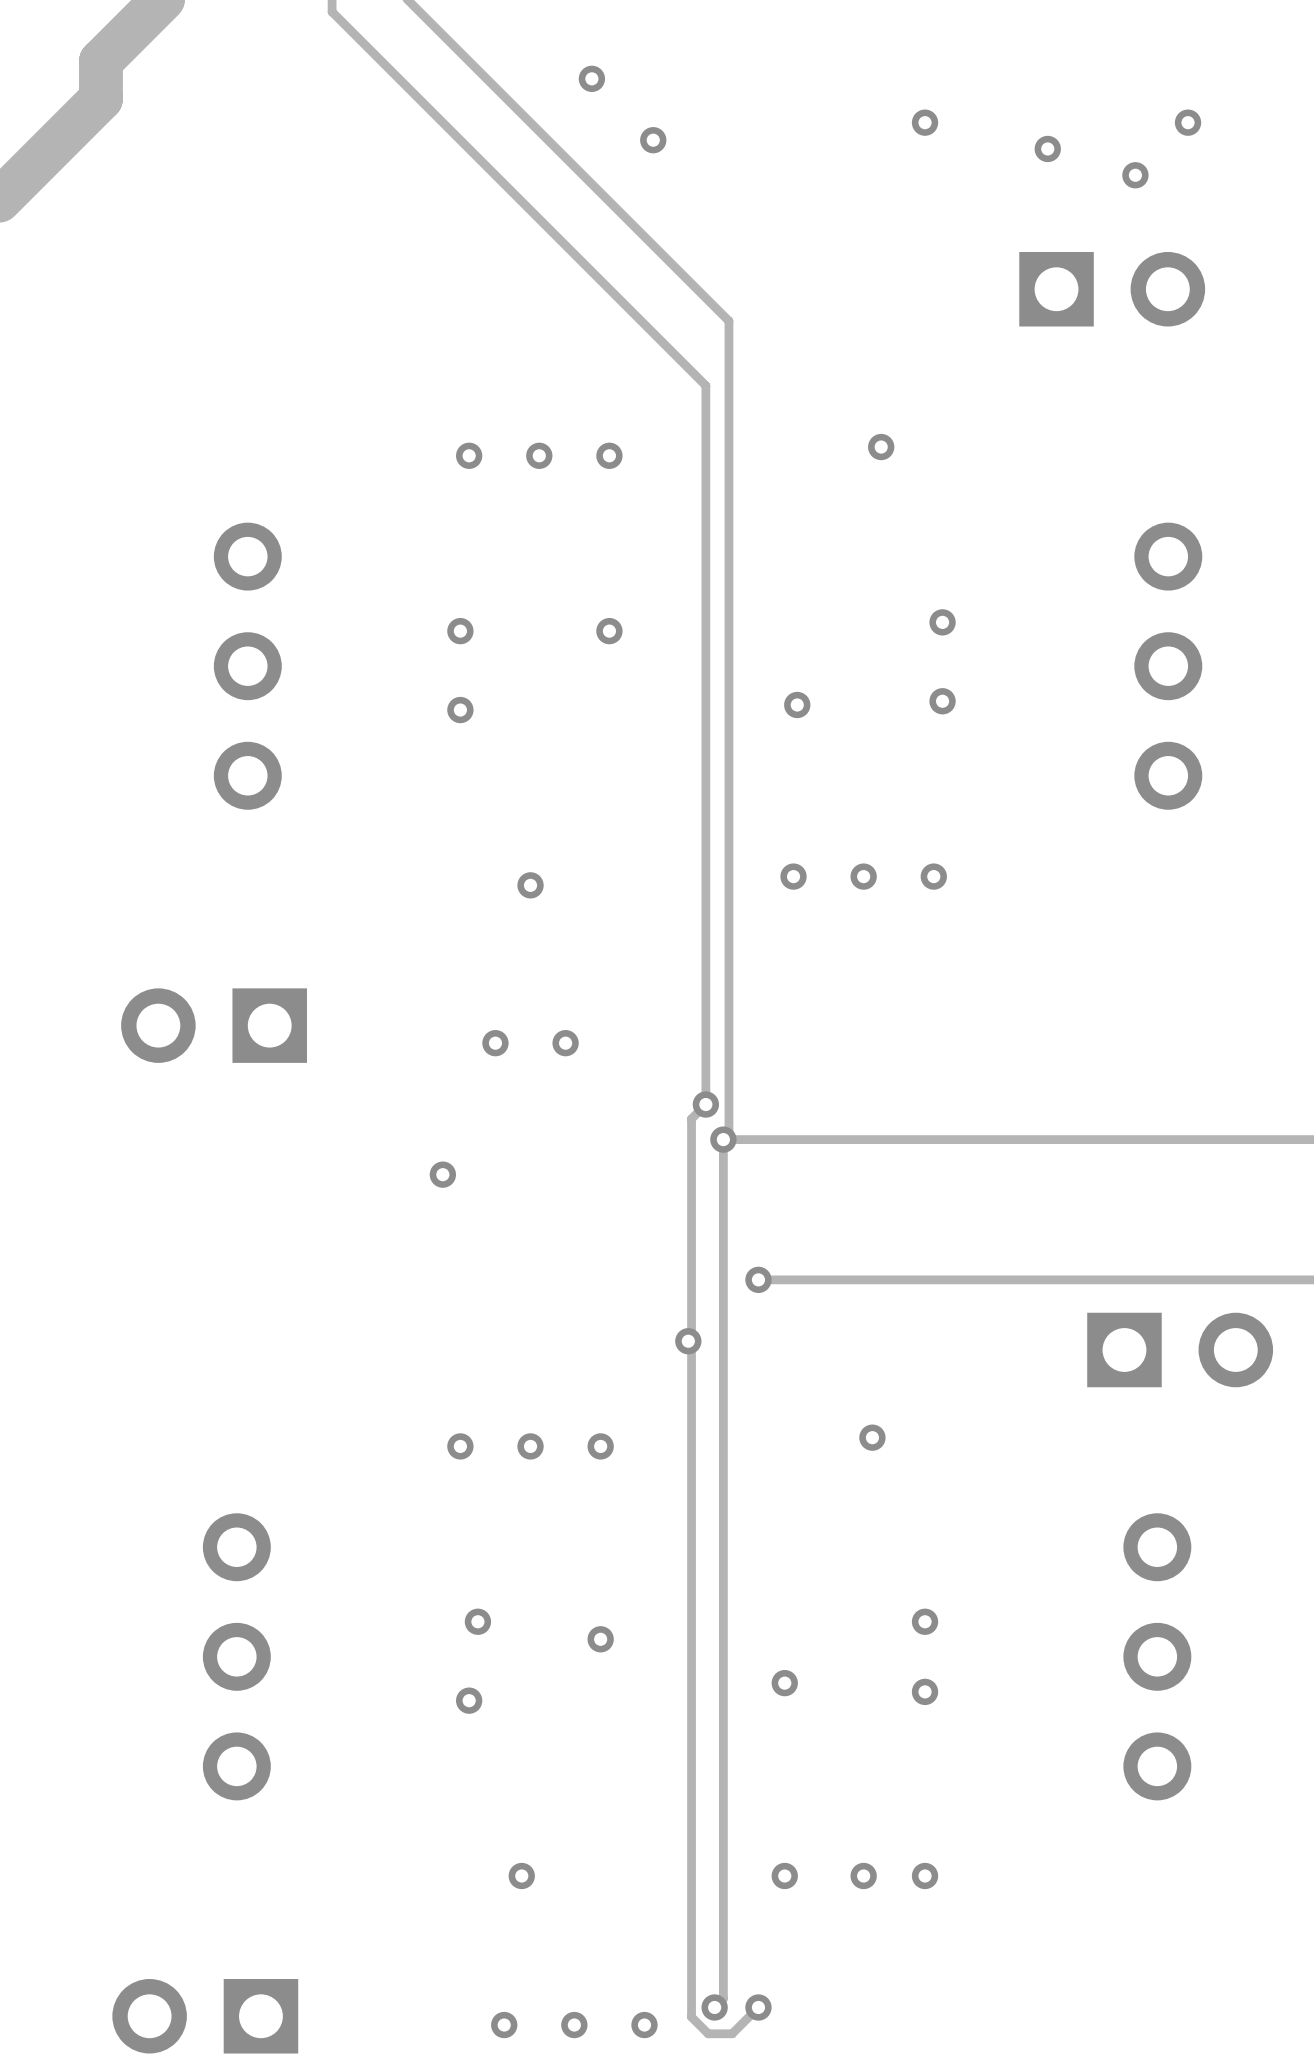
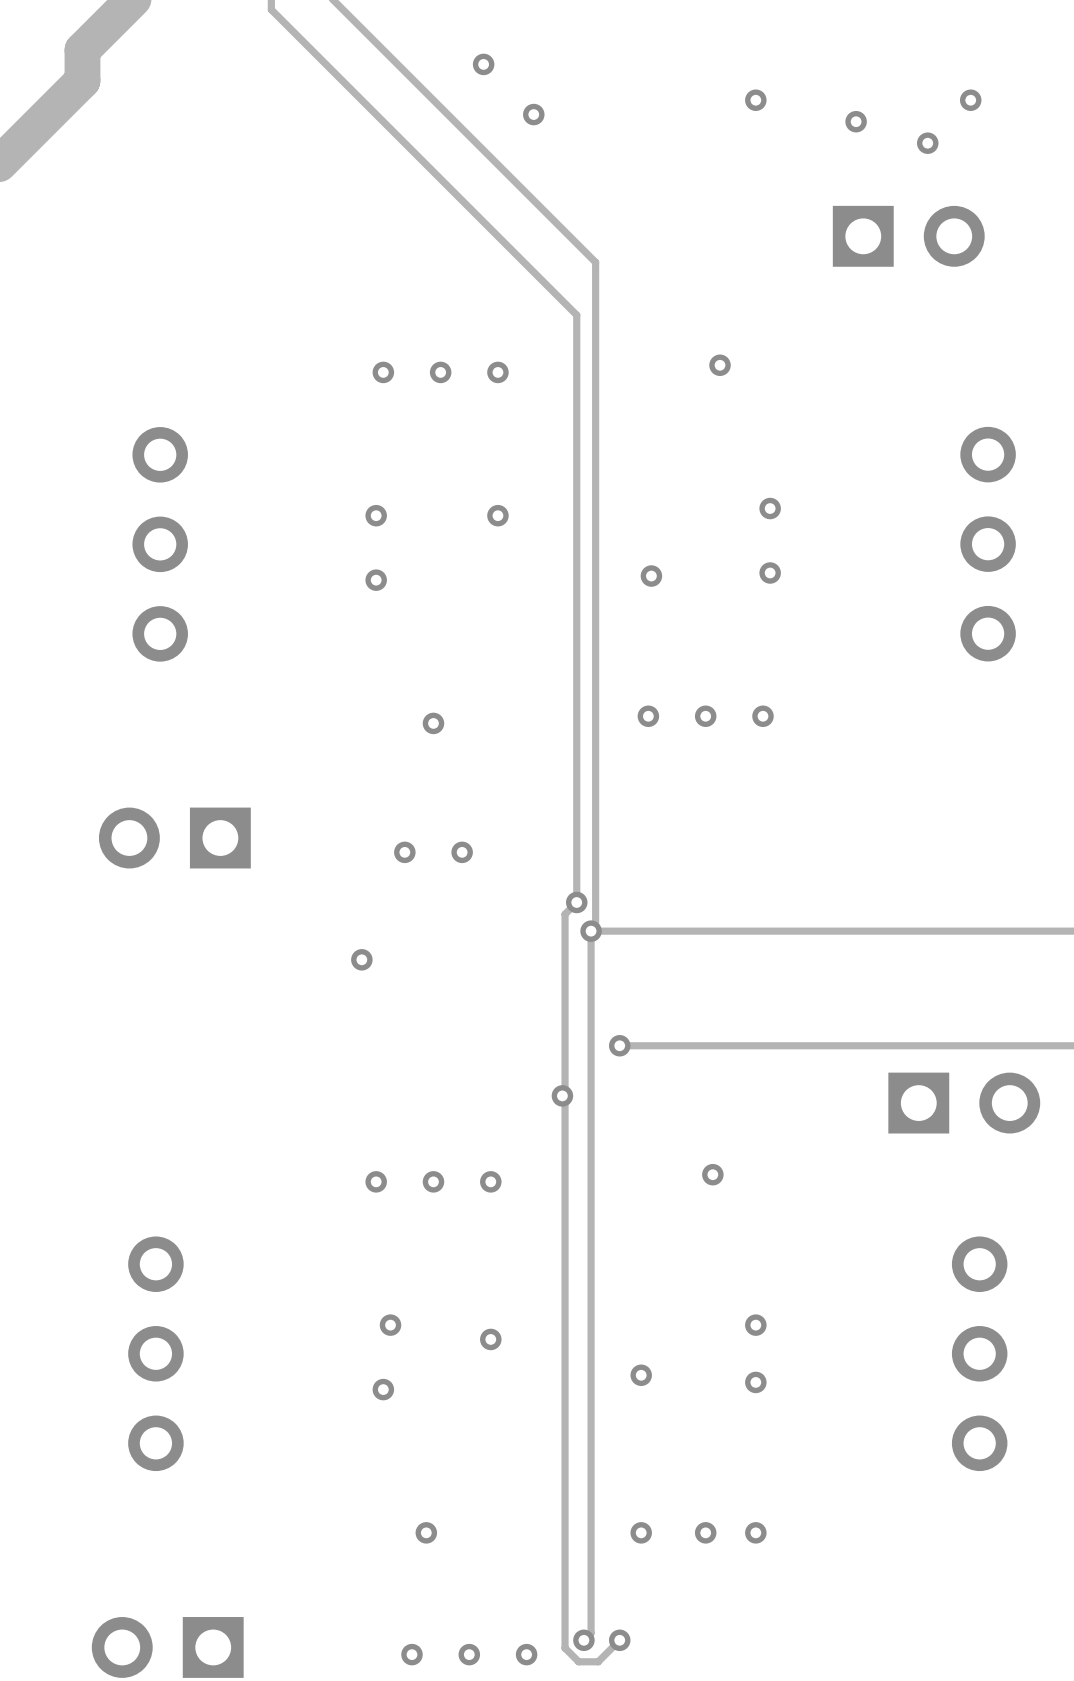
part position: (247, 666) -> (160, 544)
part position: (1168, 666) -> (988, 544)
part position: (236, 1656) -> (155, 1353)
part position: (1157, 1656) -> (979, 1353)

